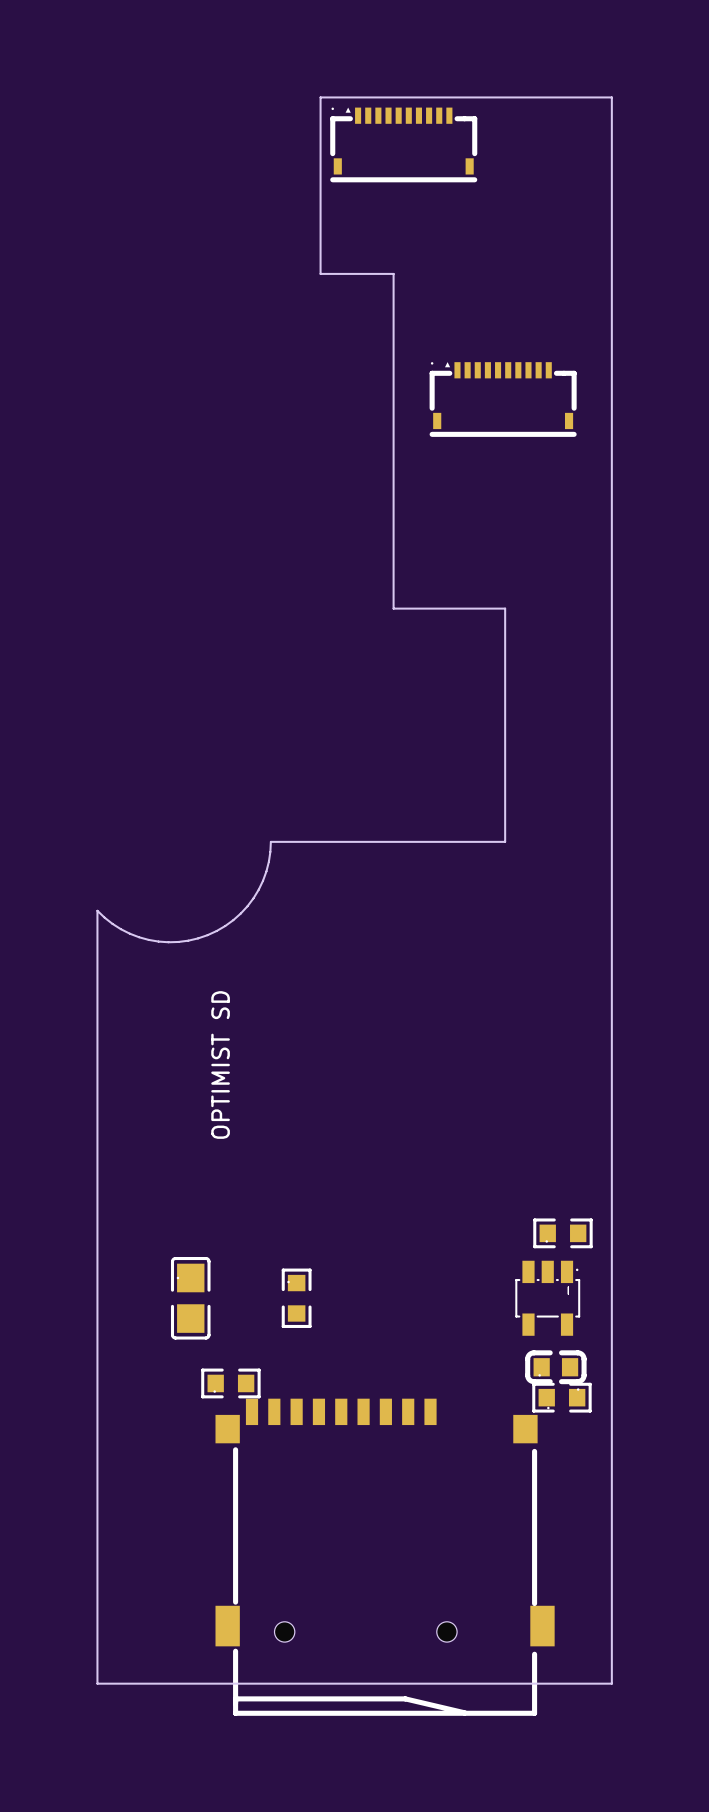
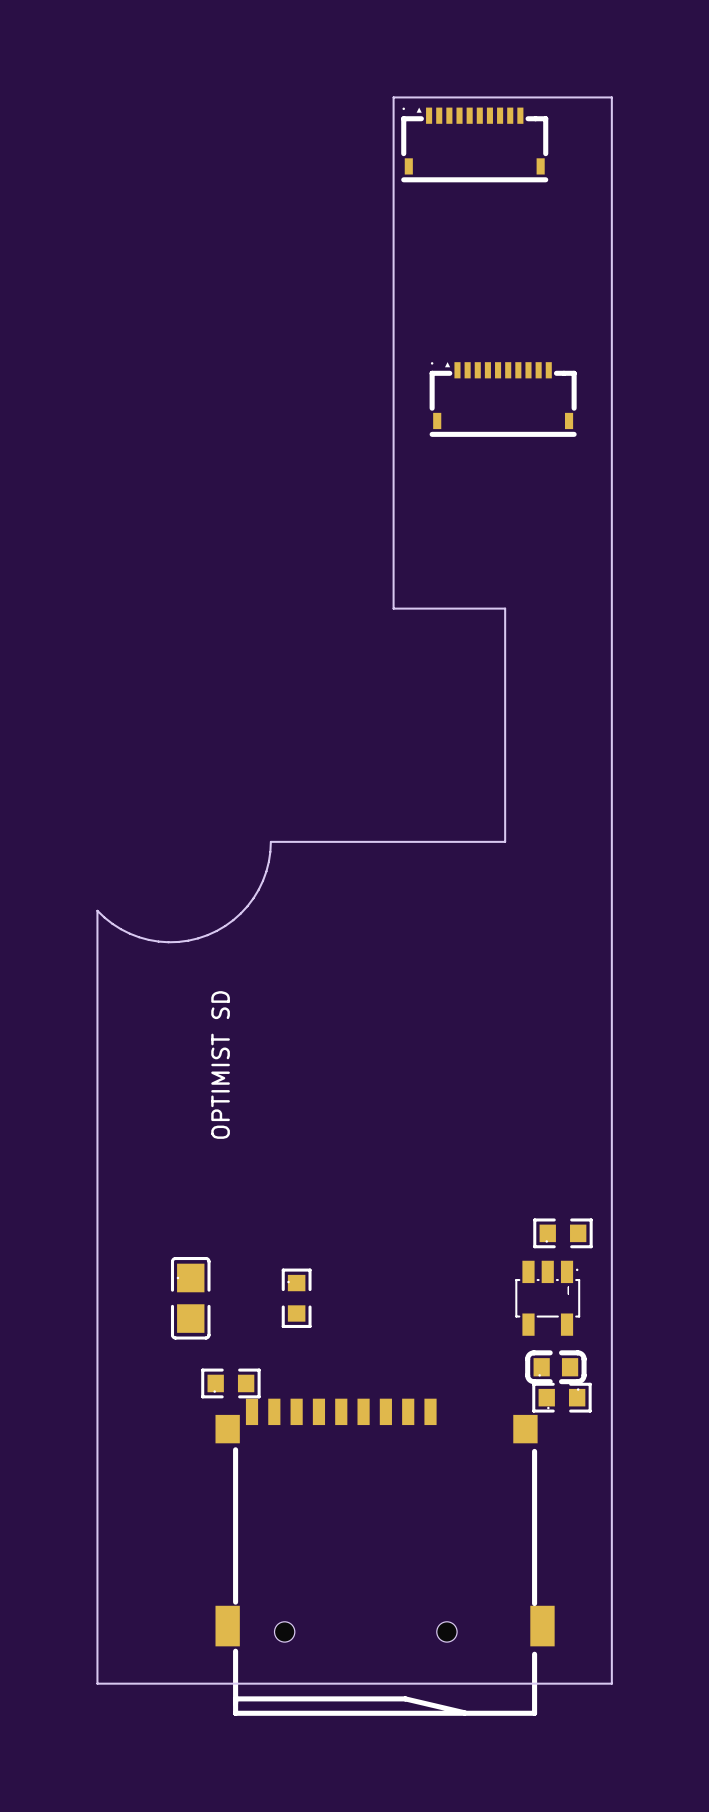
board edge: (393, 97) (320, 97) (320, 273) (393, 273) -> (393, 97) (393, 273)
part position: (403, 144) -> (474, 144)

